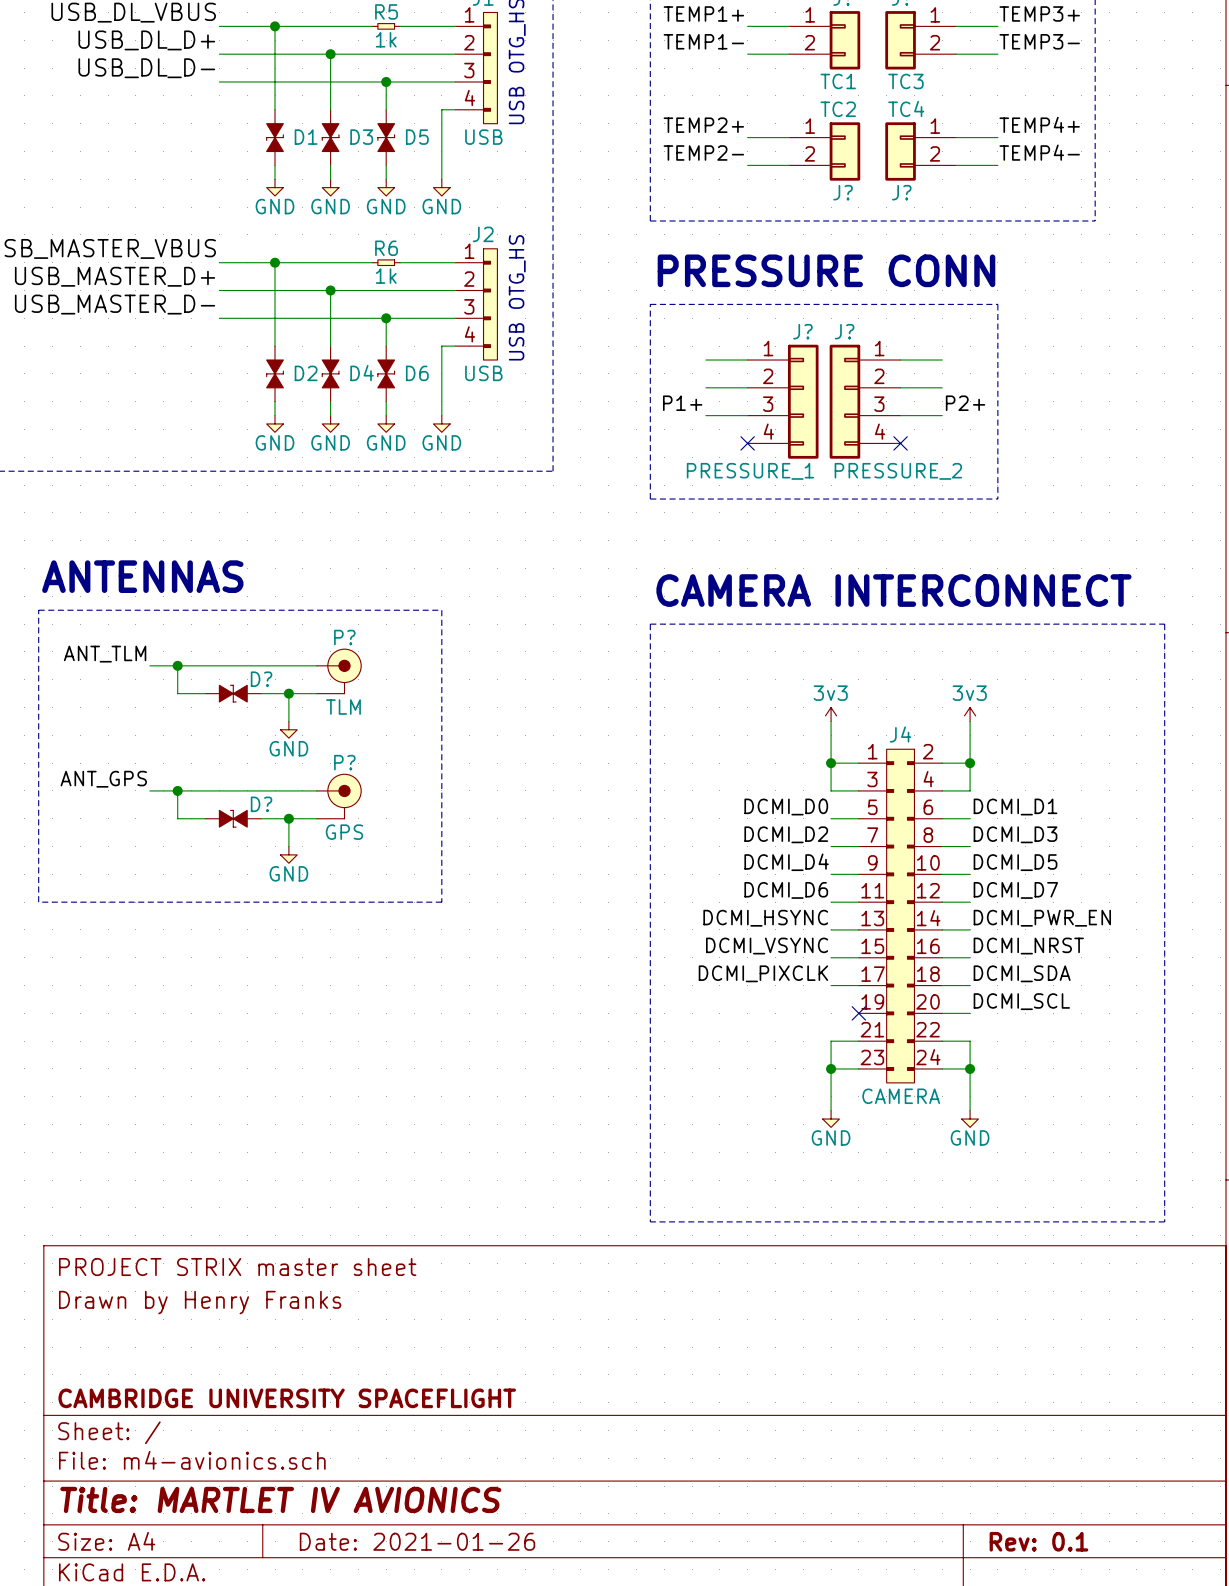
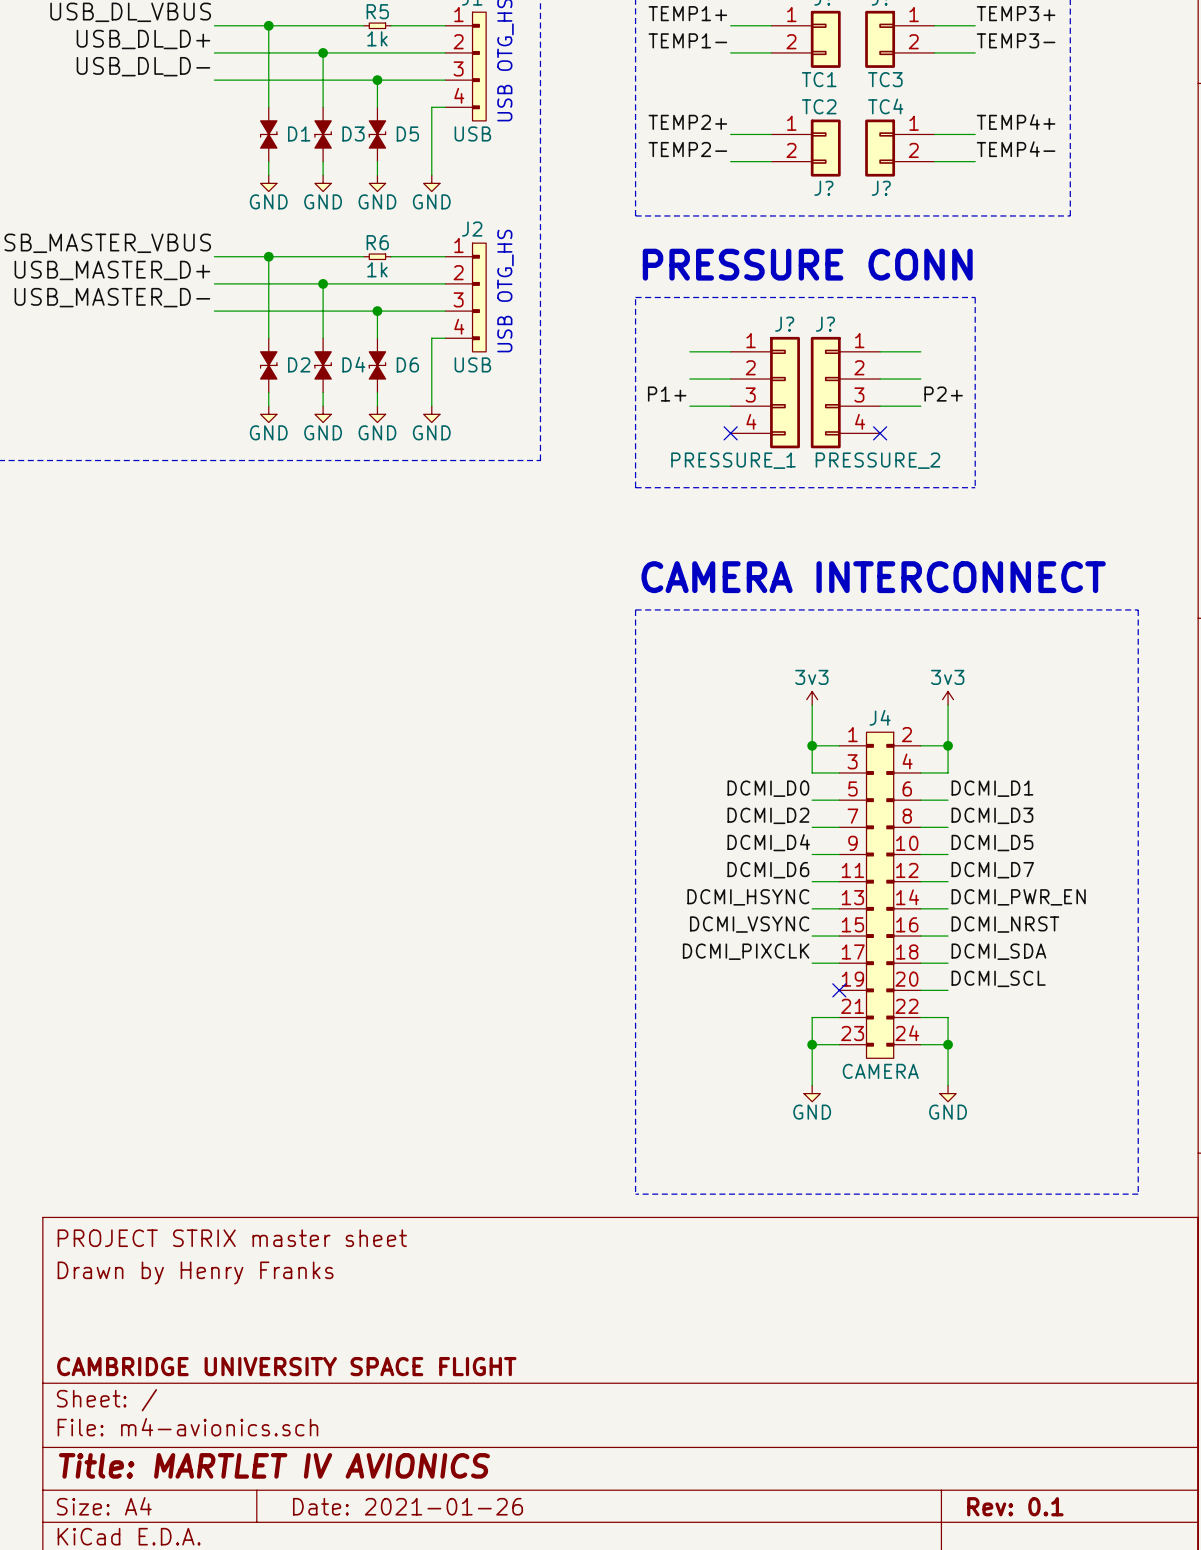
text: ANTENNAS (142, 576) -> none
line: (38, 610) (38, 902) (441, 902) (441, 610) (38, 610) -> none
label: ANT_TLM (105, 654) -> none
wire: (149, 665) (316, 665) -> none
wire: (177, 665) (177, 693) (205, 693) -> none
junction: (177, 665) -> none
P?: TLM (338, 671) -> none
D?: (233, 693) -> none
wire: (261, 693) (316, 693) -> none
wire: (288, 693) (288, 721) -> none
junction: (288, 693) -> none
power symbol: GND (288, 729) -> none
label: ANT_GPS (103, 779) -> none
wire: (149, 790) (316, 790) -> none
wire: (177, 790) (177, 818) (205, 818) -> none
junction: (177, 790) -> none
P?: GPS (338, 796) -> none
D?: (233, 818) -> none
wire: (261, 818) (316, 818) -> none
wire: (288, 818) (288, 846) -> none
junction: (288, 818) -> none
power symbol: GND (288, 854) -> none
title block: CAMBRIDGE UNIVERSITY SPACEFLIGHT (287, 1398) -> CAMBRIDGE UNIVERSITY SPACE FLIGHT (286, 1366)

